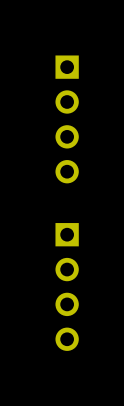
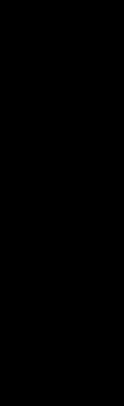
part: (67, 119) -> none
part: (67, 286) -> none

